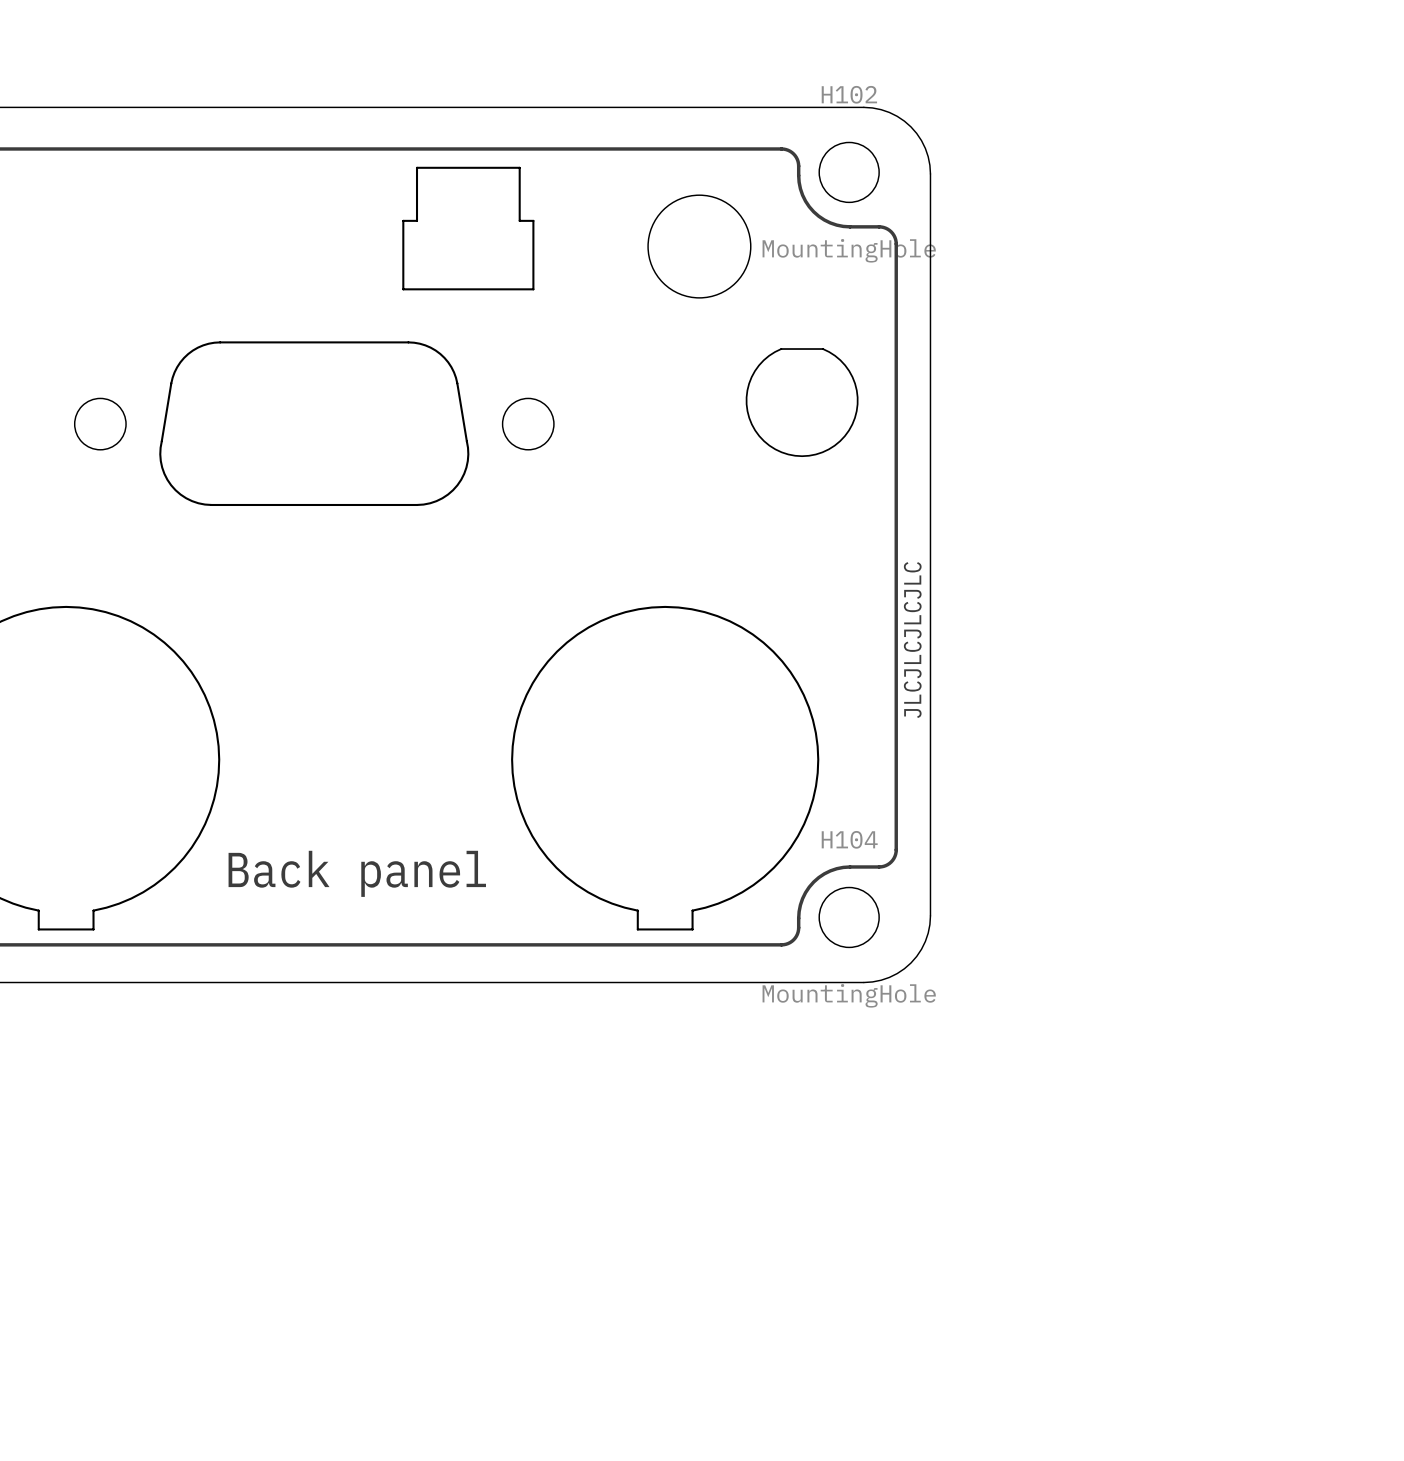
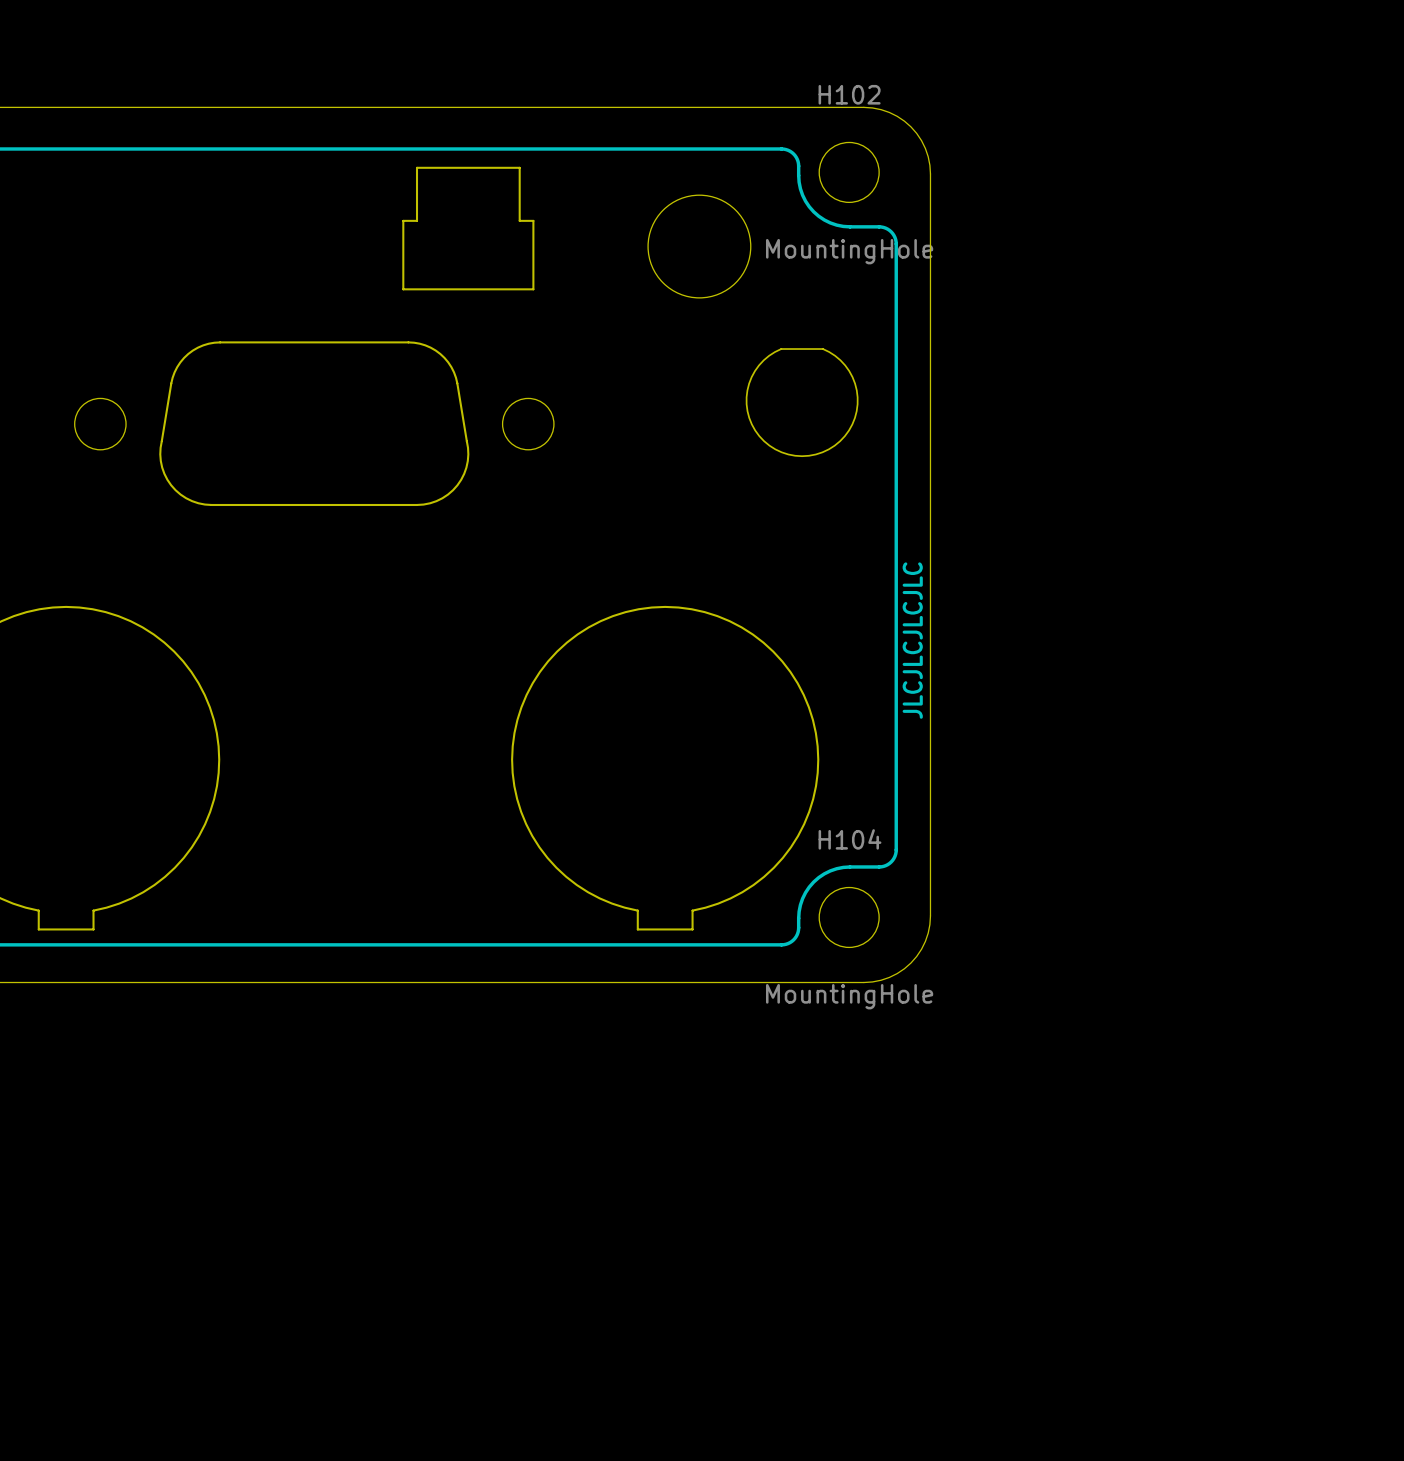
text: Back panel (357, 873) -> none

